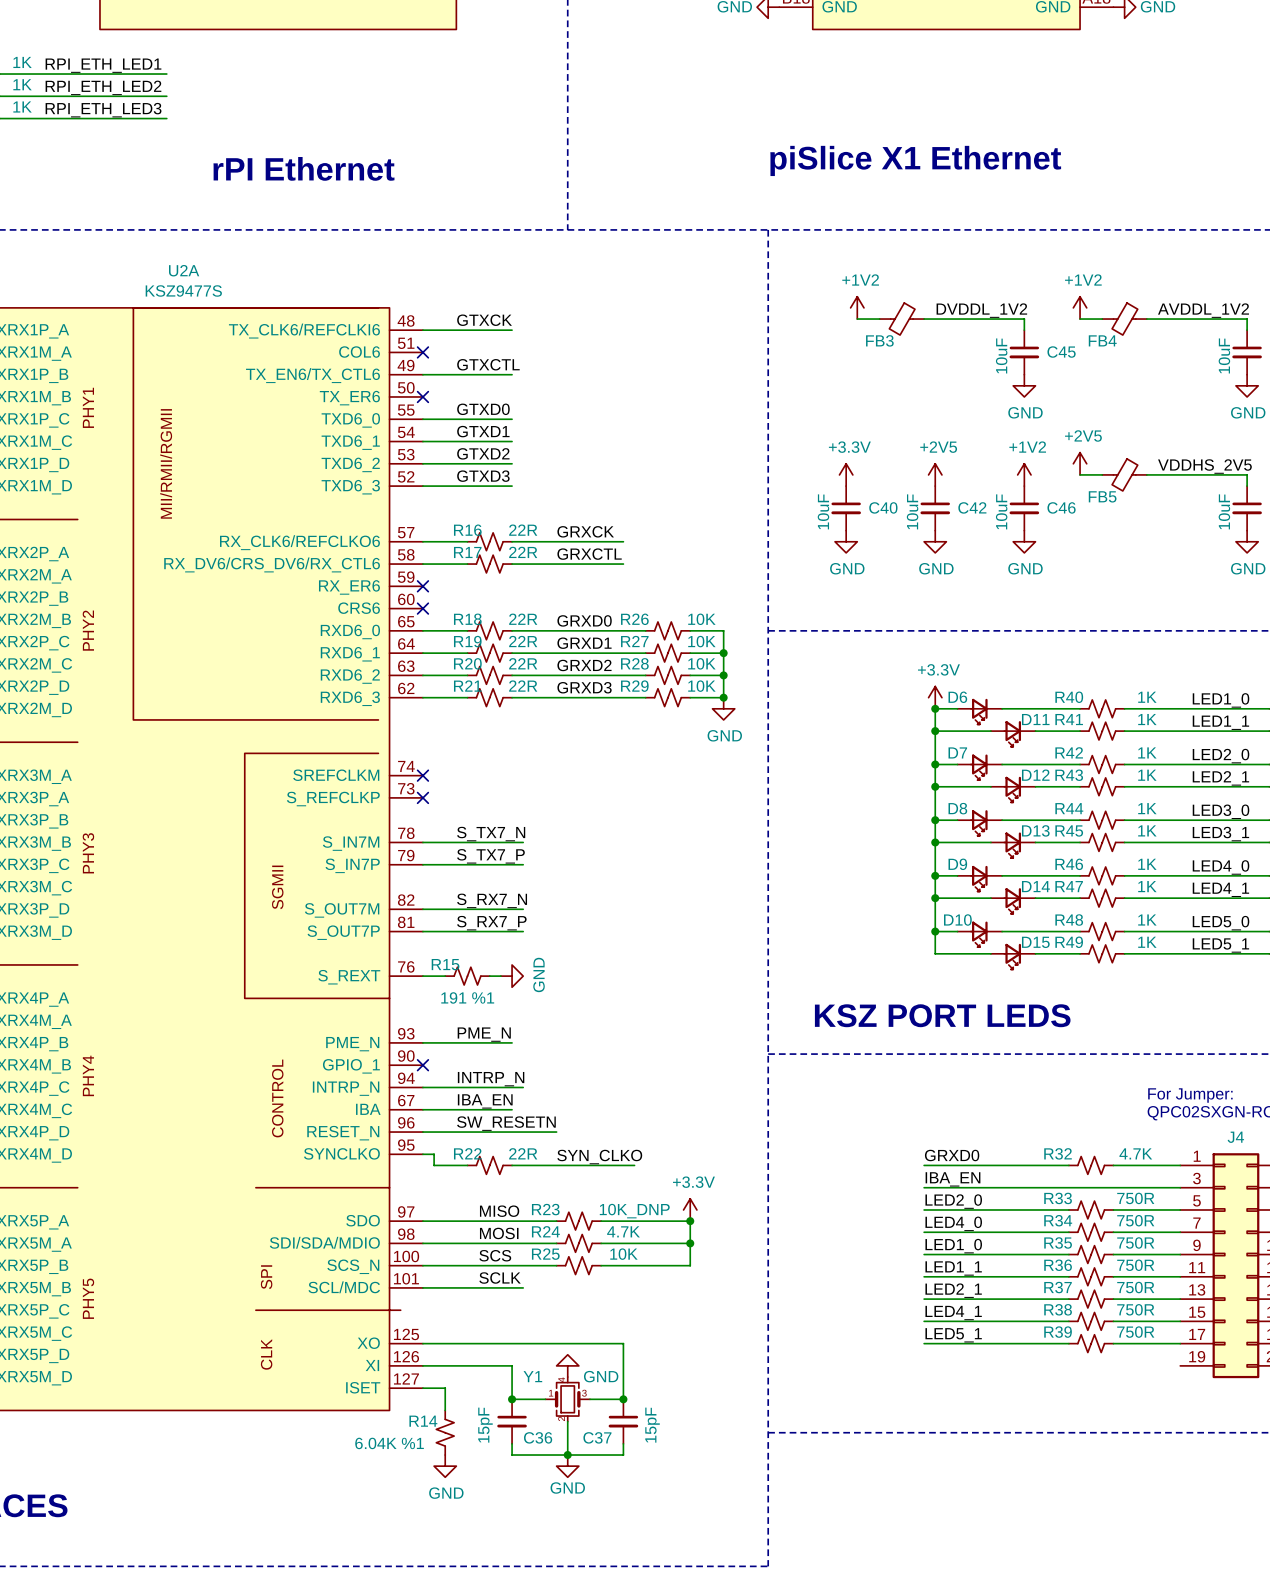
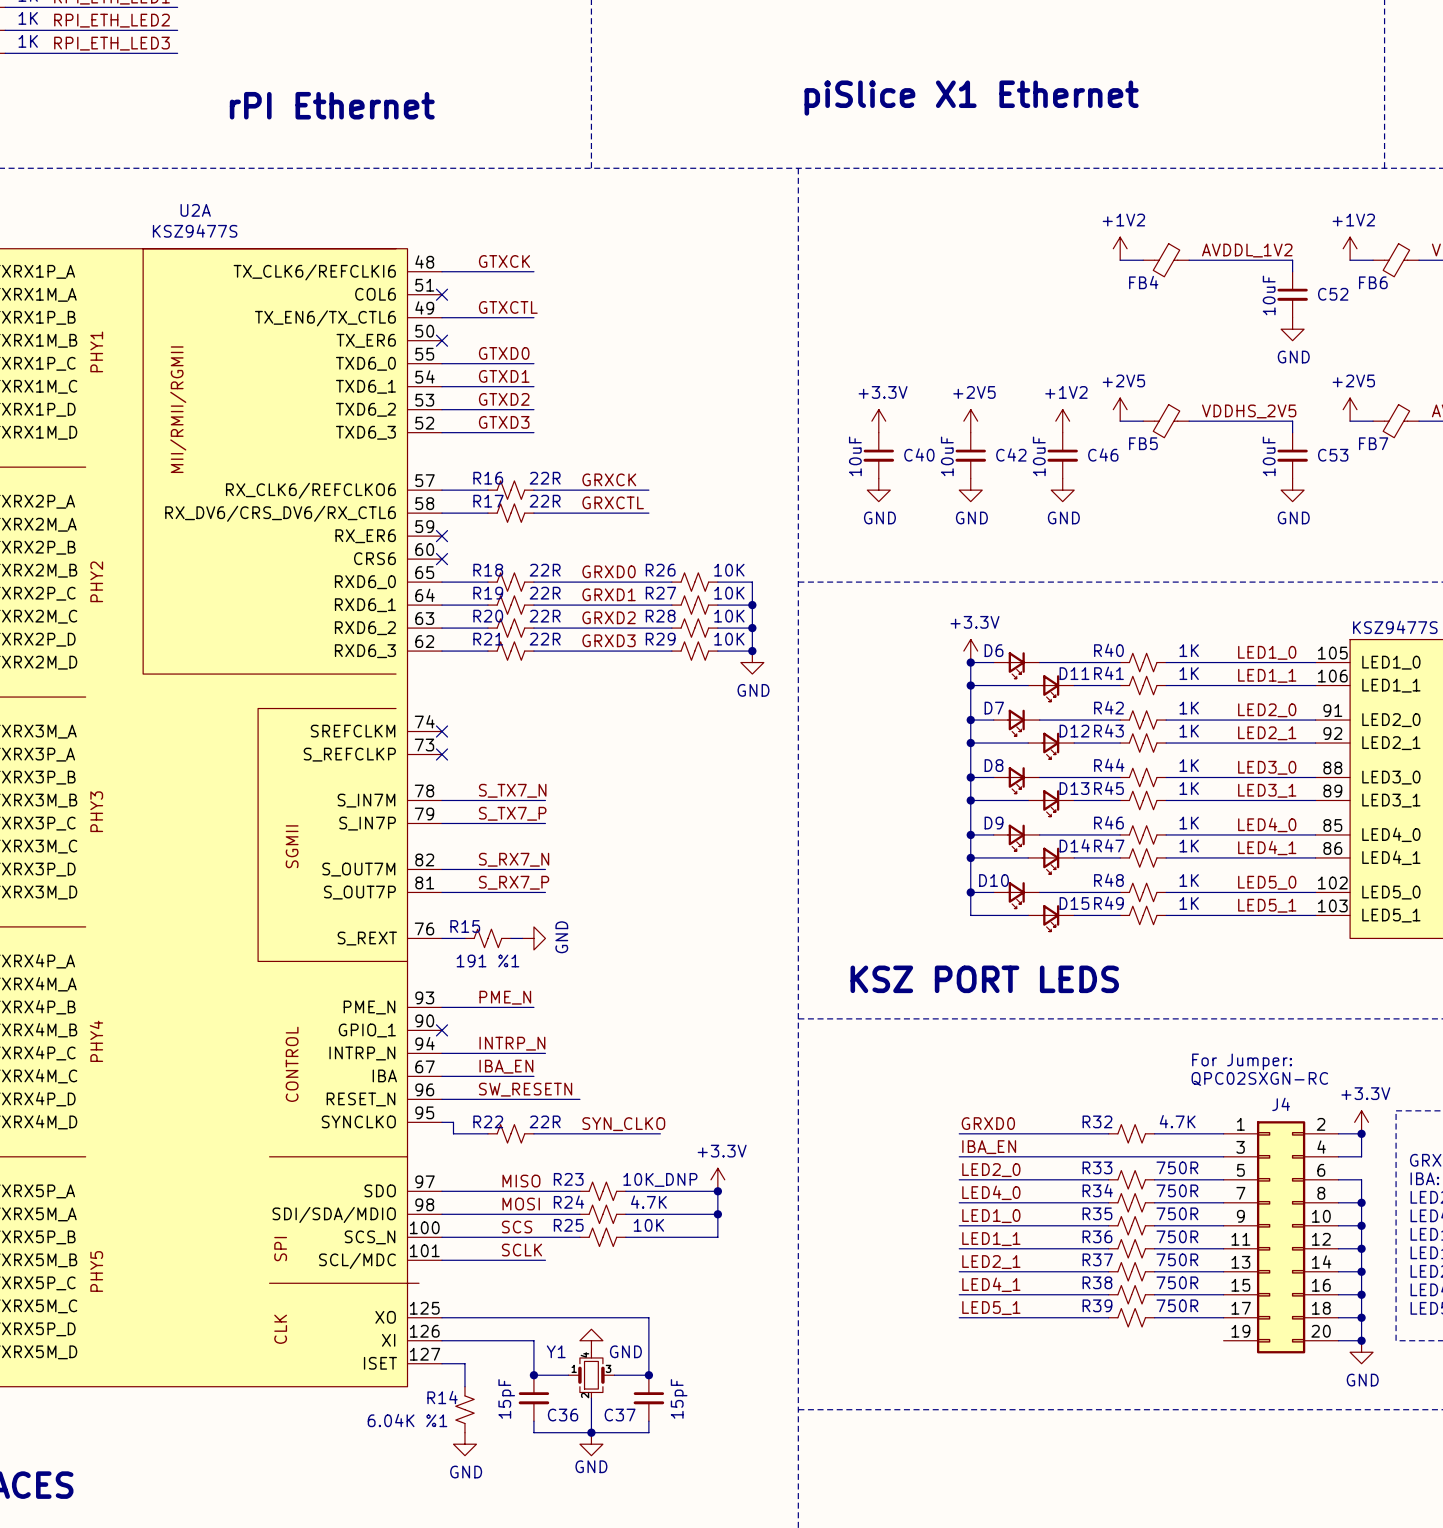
power symbol: +1V2 (857, 307) -> none
label: DVDDL_1V2 (981, 310) -> none
wire: (857, 319) (879, 319) -> none
FB3: (901, 319) -> none
wire: (924, 319) (1024, 319) (1024, 330) -> none
C45: 10uF (1024, 352) -> none
power symbol: GND (1024, 385) -> none

